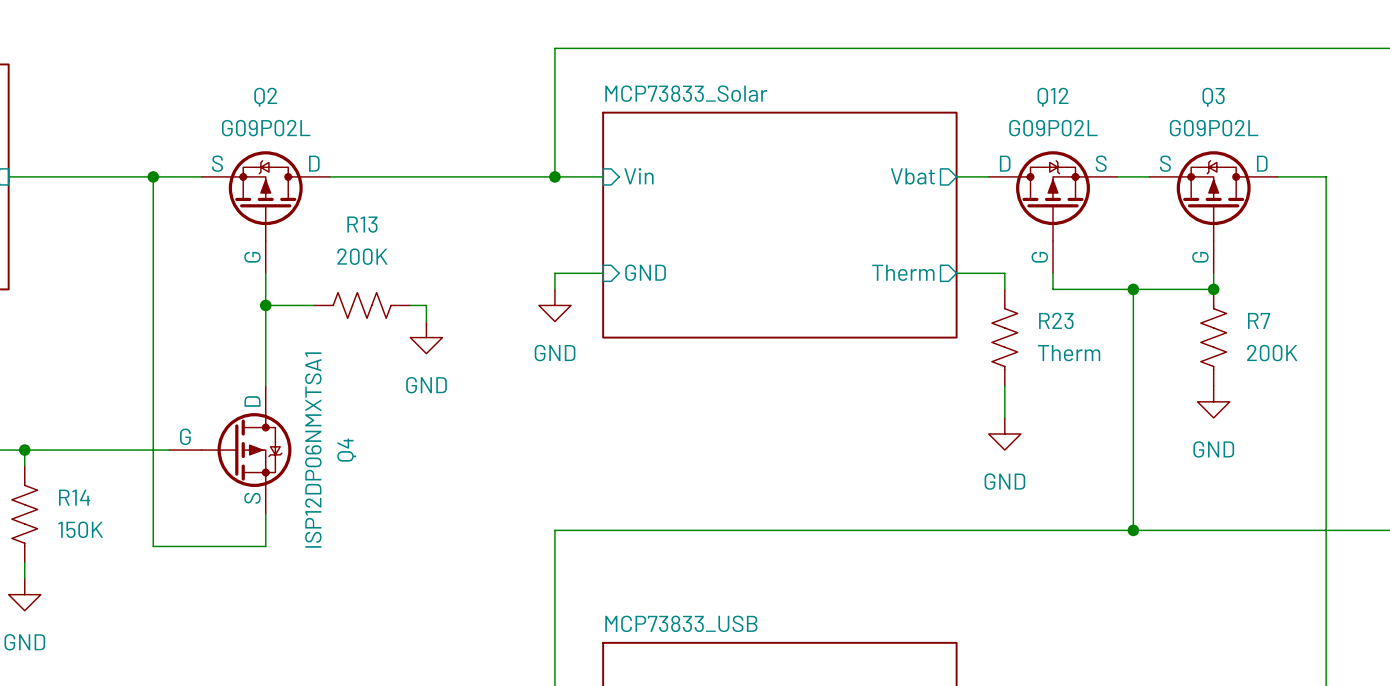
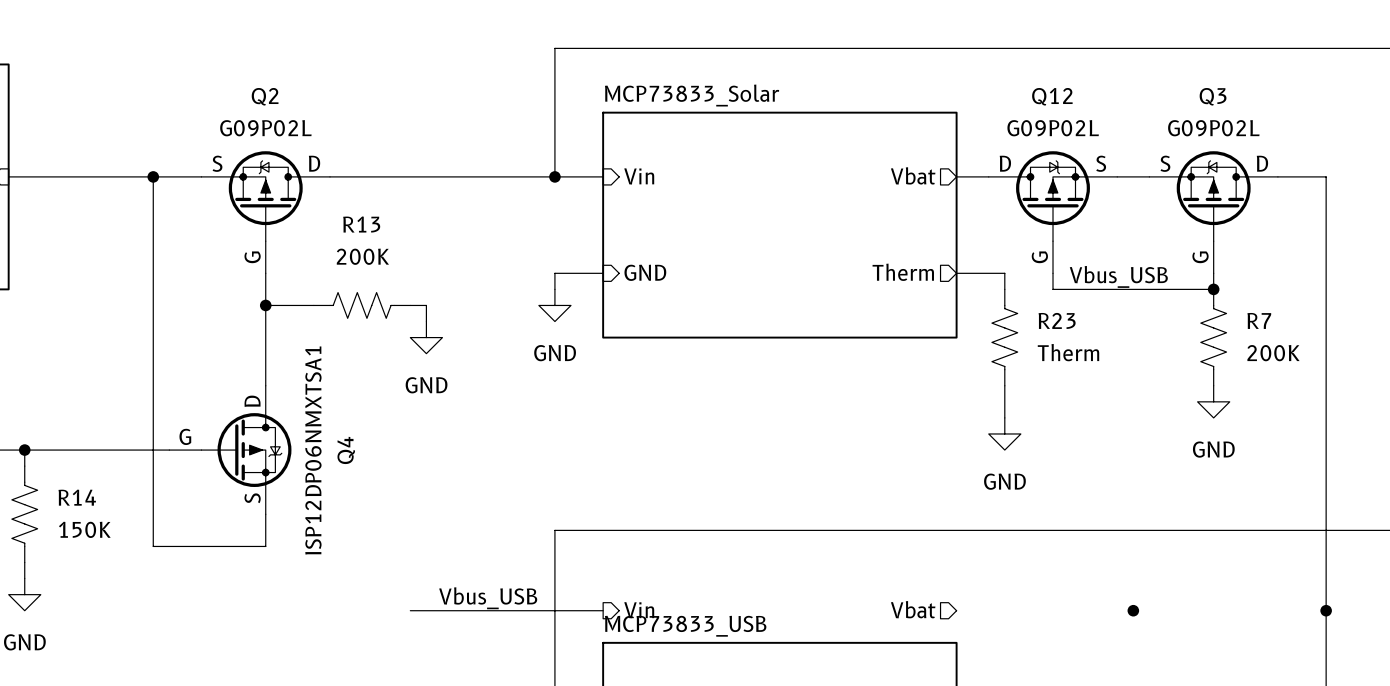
label: none -> Vbus_USB (1118, 276)
wire: (1133, 289) (1133, 530) -> none
junction: (1133, 289) -> none
junction: (1133, 530) -> none
label: none -> Vbus_USB (488, 598)
wire: none -> (410, 610) (603, 610)
sheet pin: none -> Vin (639, 610)
sheet pin: none -> Vbat (913, 609)
junction: none -> (1133, 610)
junction: none -> (1326, 610)

